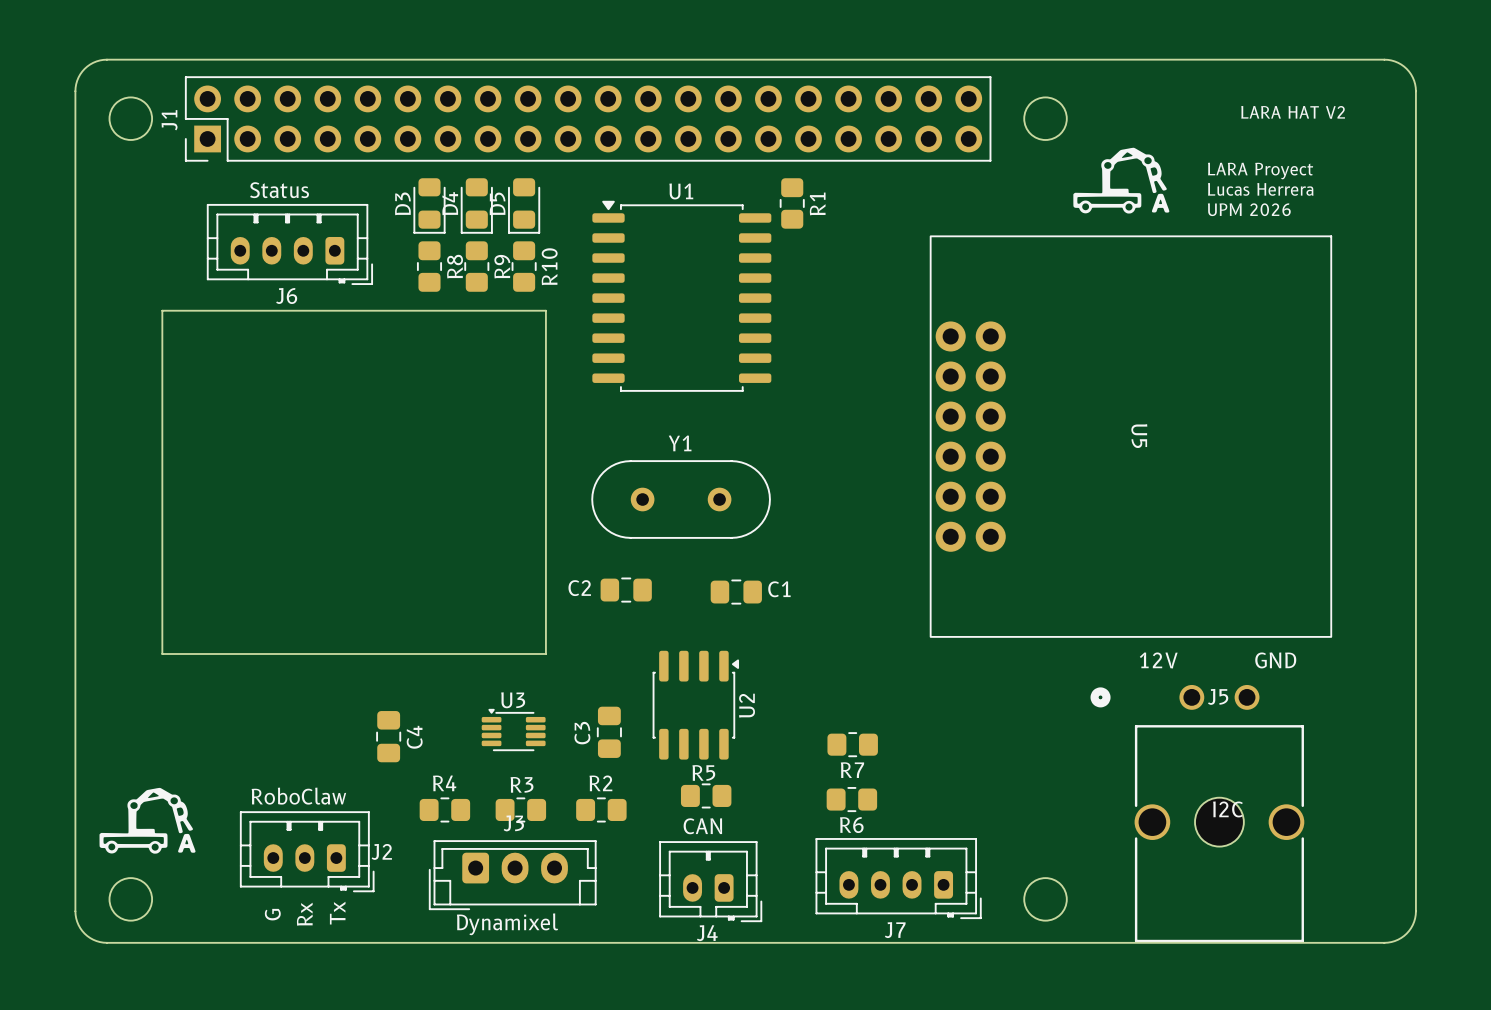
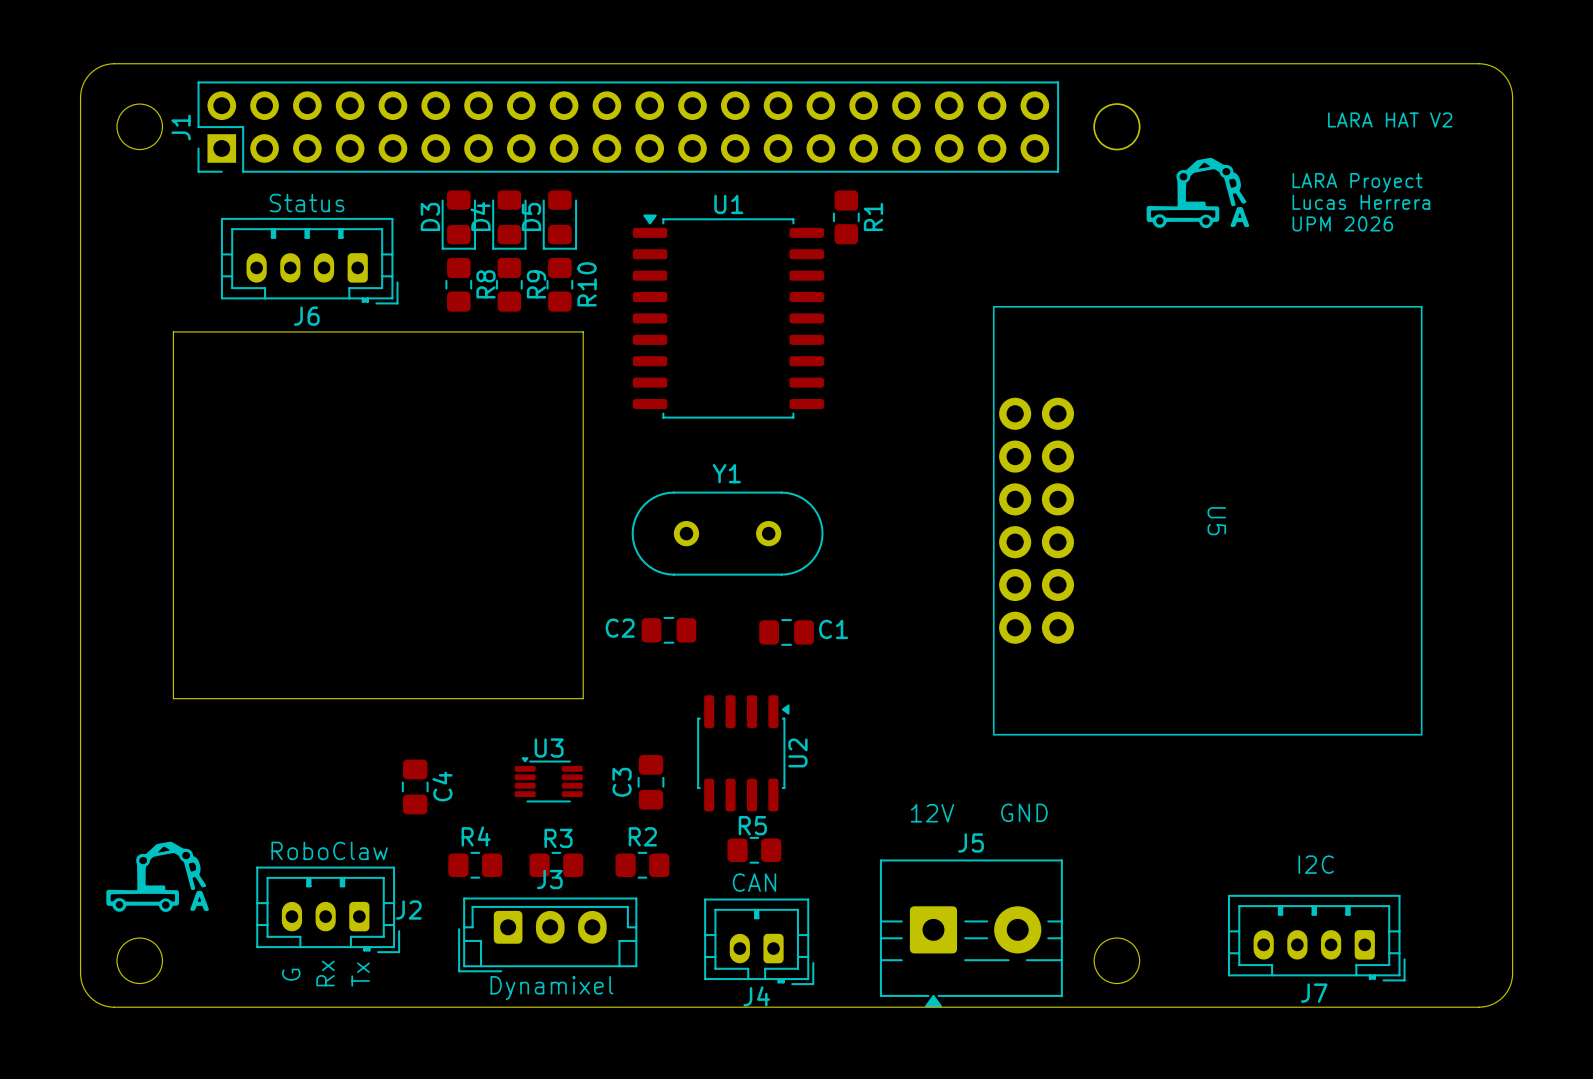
U5 position: (1130, 436) -> (1207, 520)
text position: 12V (1158, 660) -> 12V (932, 813)
text position: GND (1275, 660) -> GND (1024, 812)
J5 footprint: [1090, 684, 1305, 943] -> [879, 859, 1063, 1008]
J5 name position: J5 (1218, 696) -> J5 (970, 842)
R7: (852, 744) -> none
R6: (851, 799) -> none
J7 position: (898, 878) -> (1316, 938)

